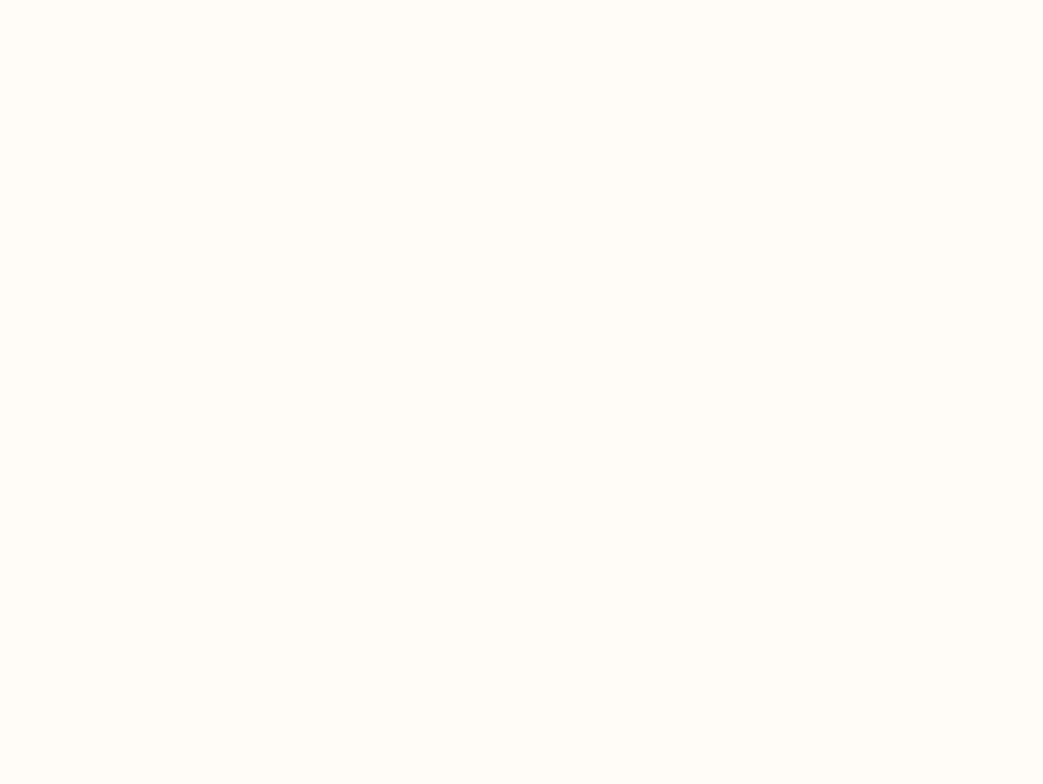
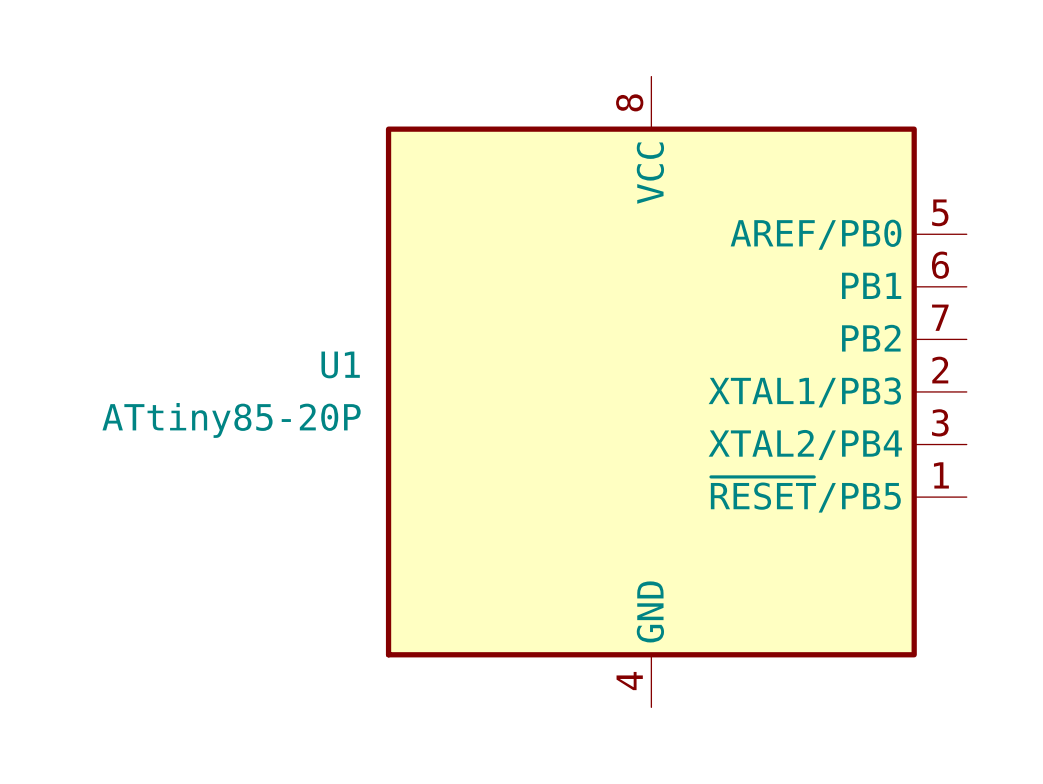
U1: none -> ATtiny85-20P (676, 391)

